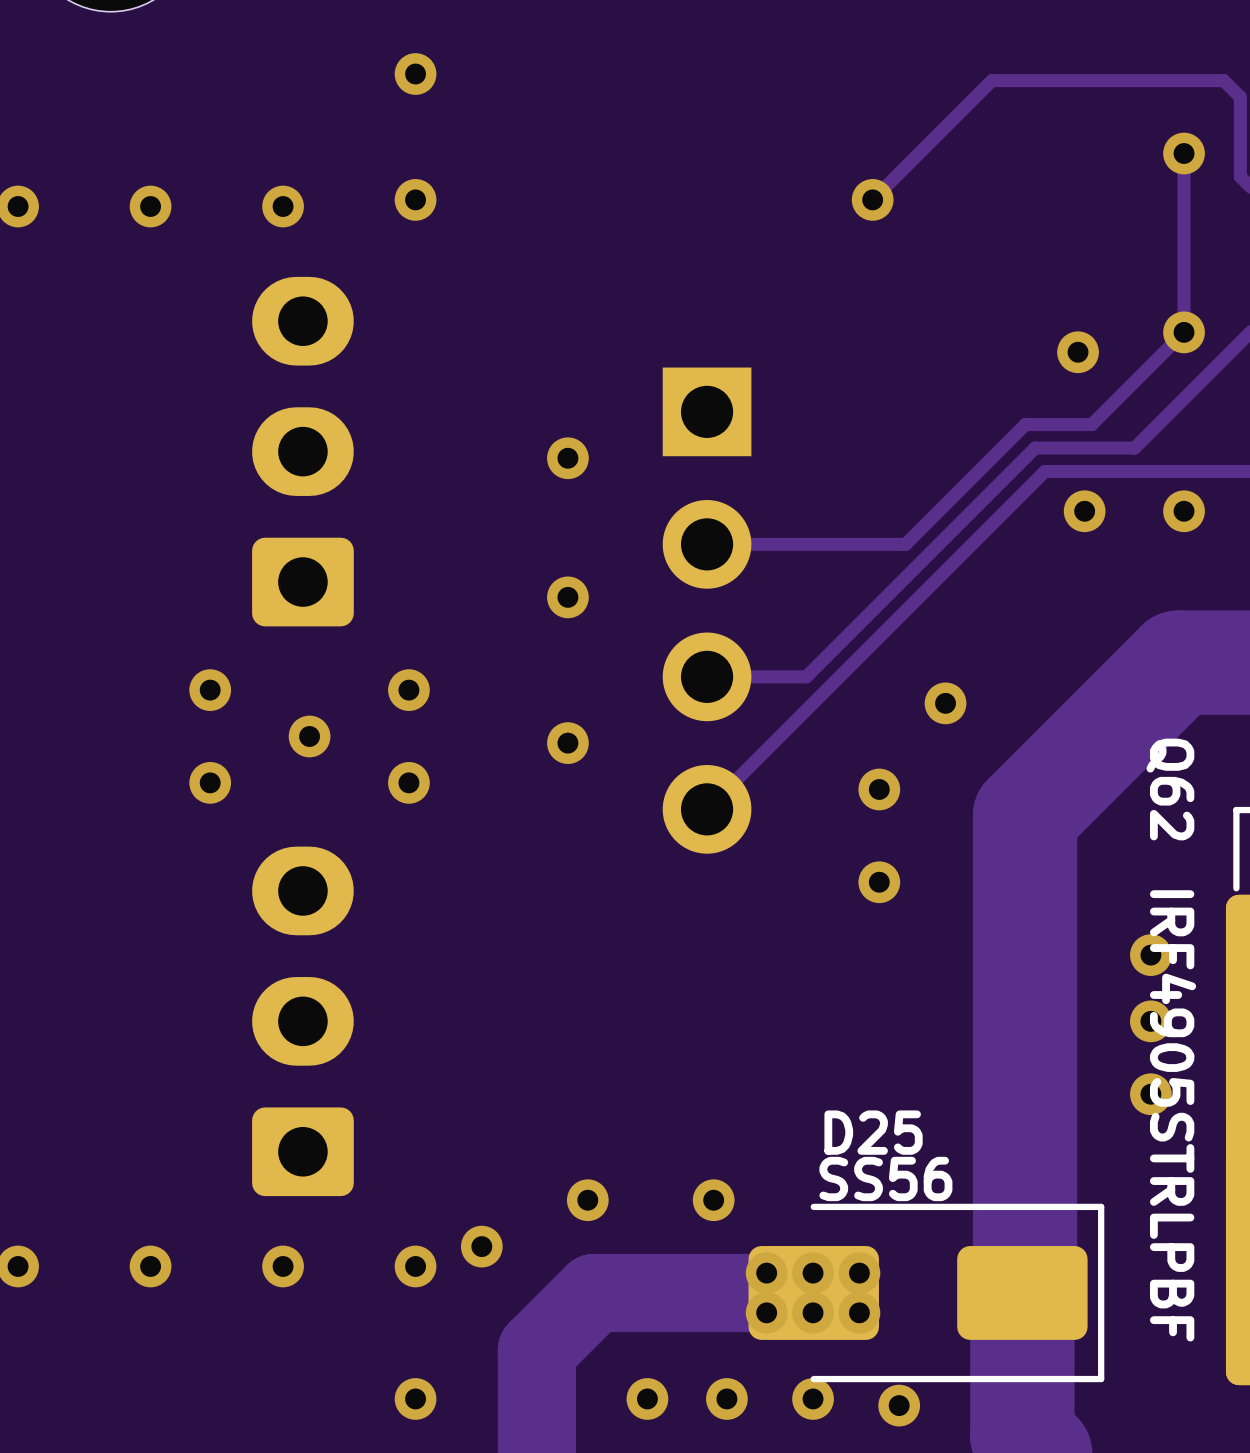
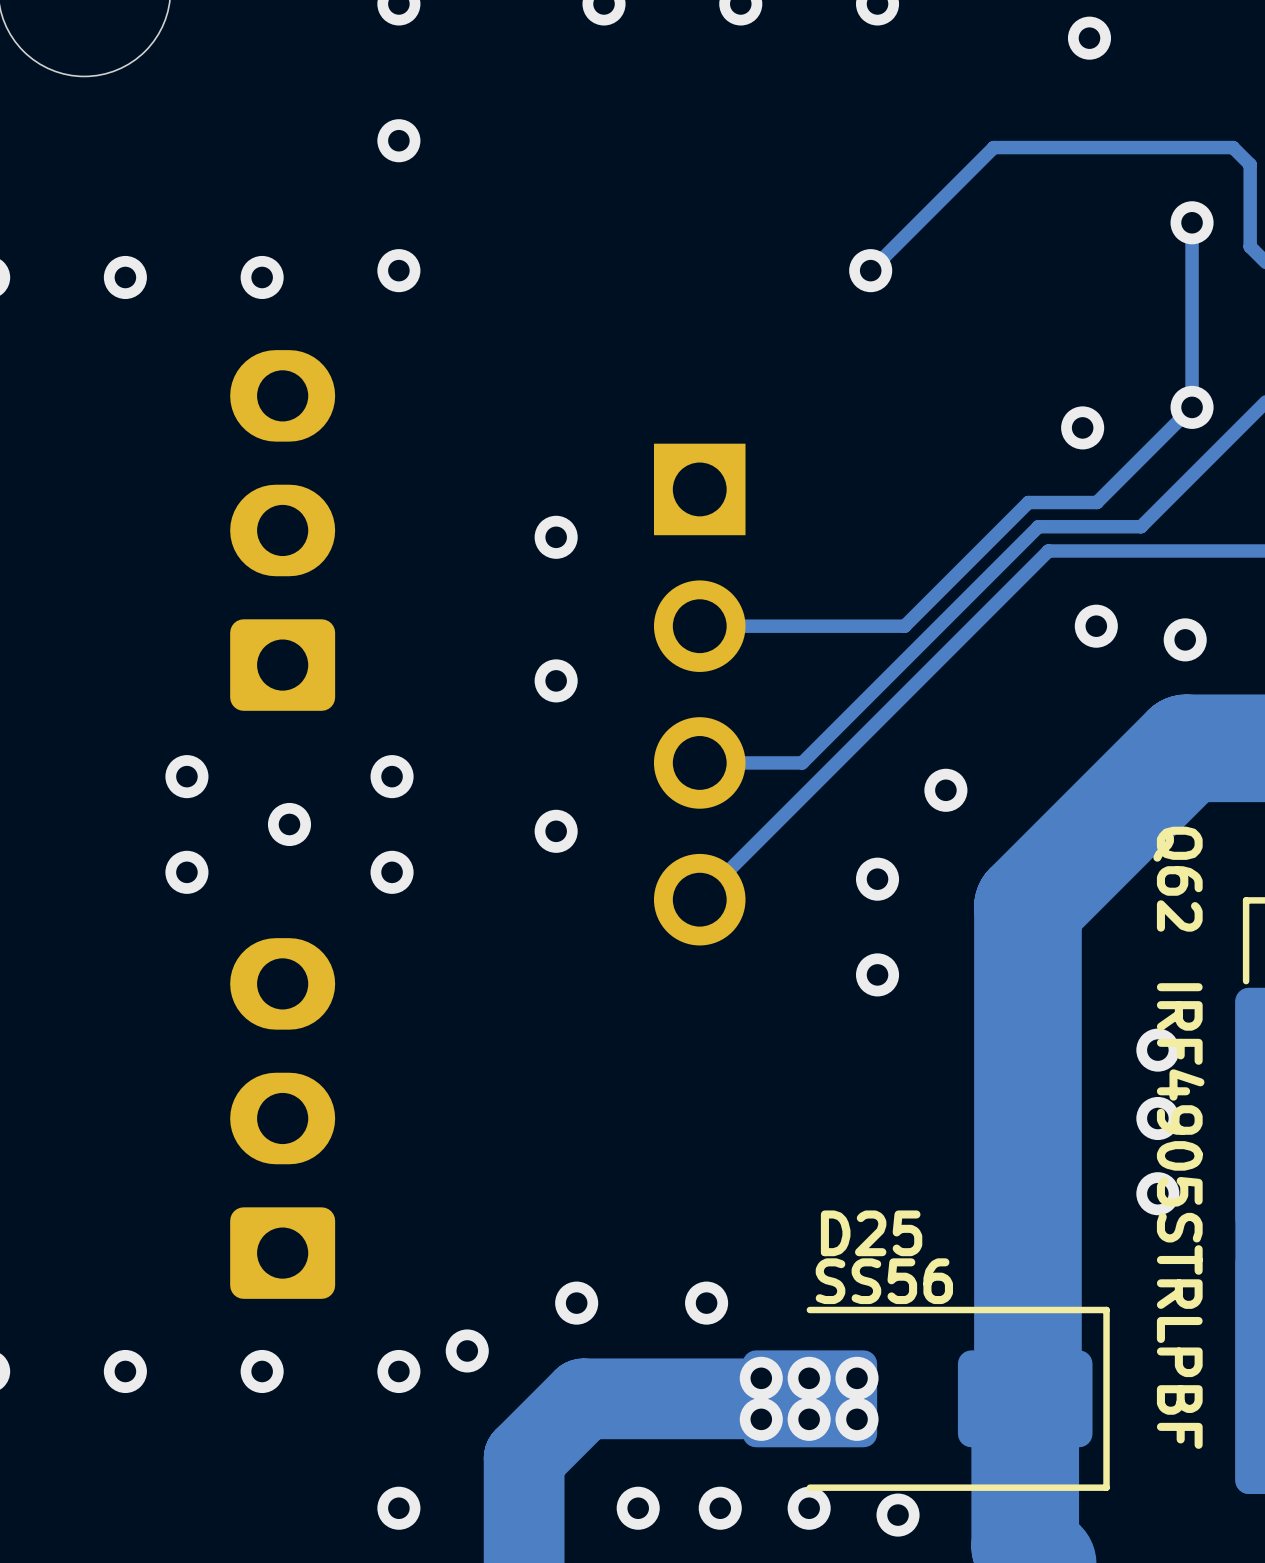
via position: (1084, 511) -> (1096, 626)
via position: (1184, 511) -> (1185, 639)

